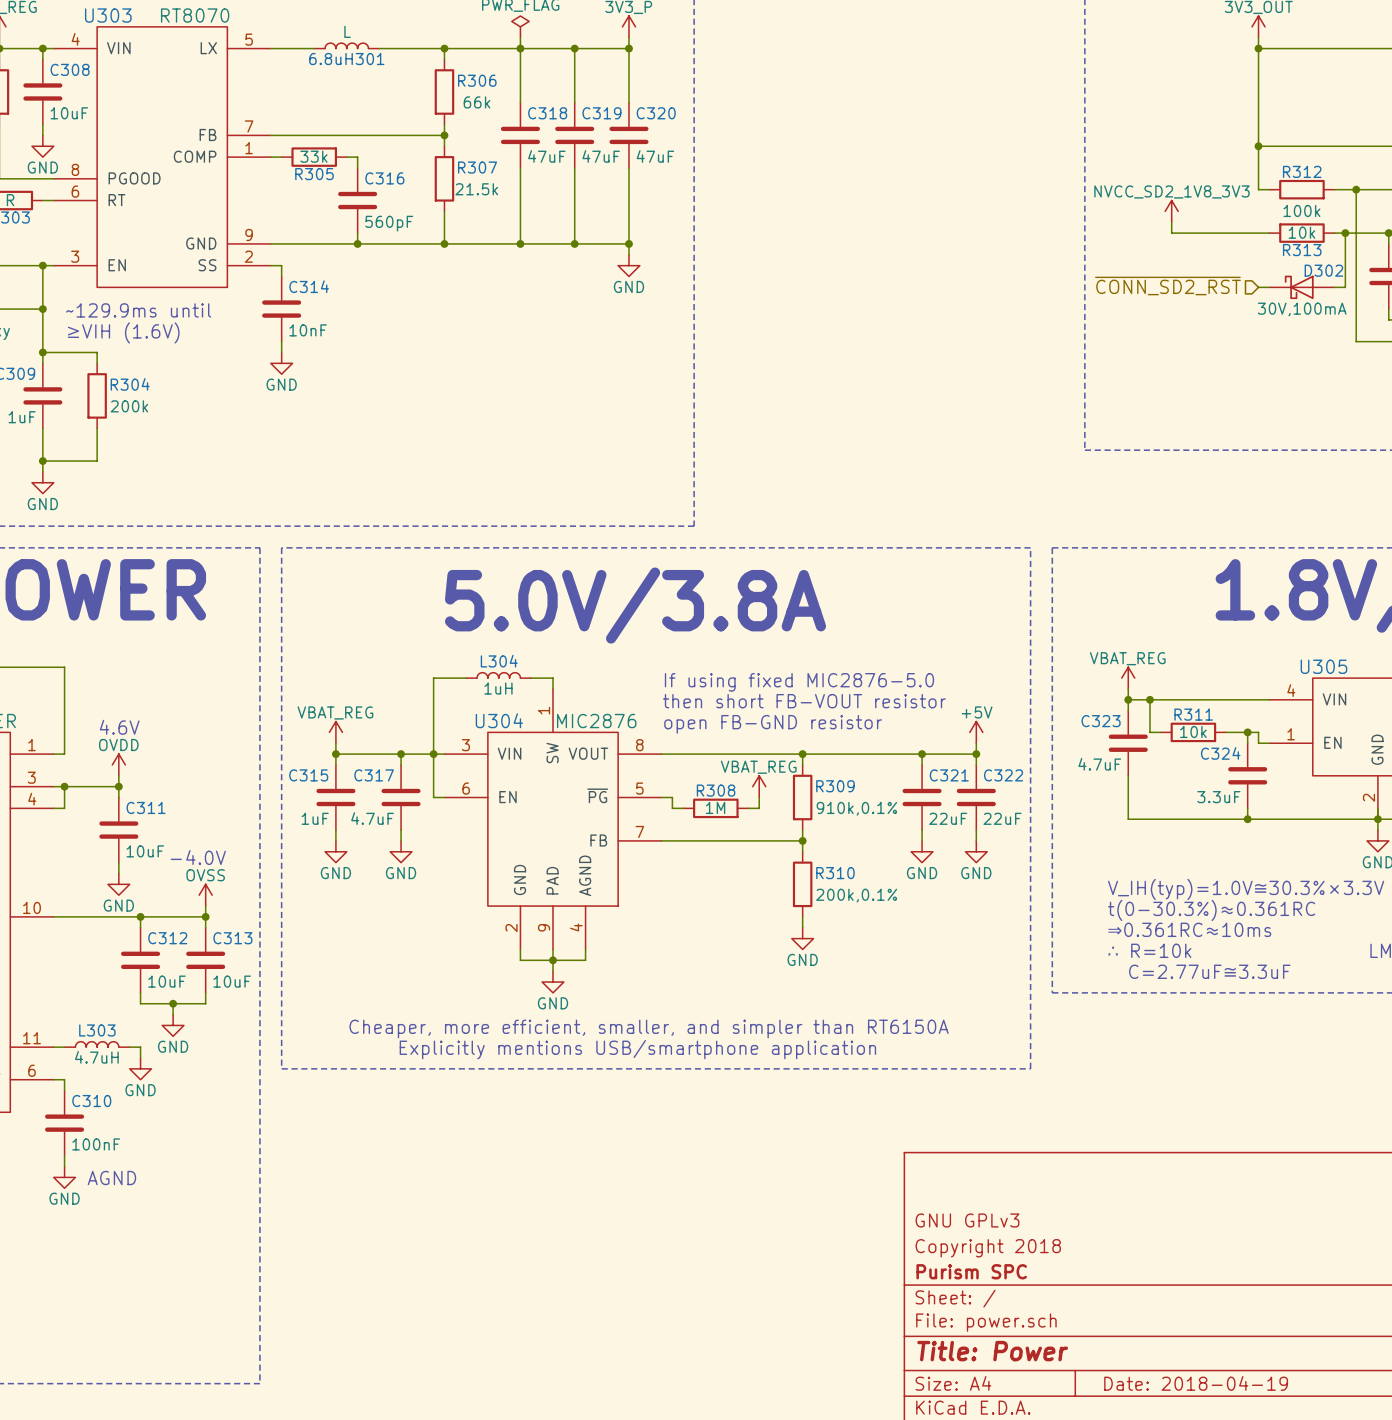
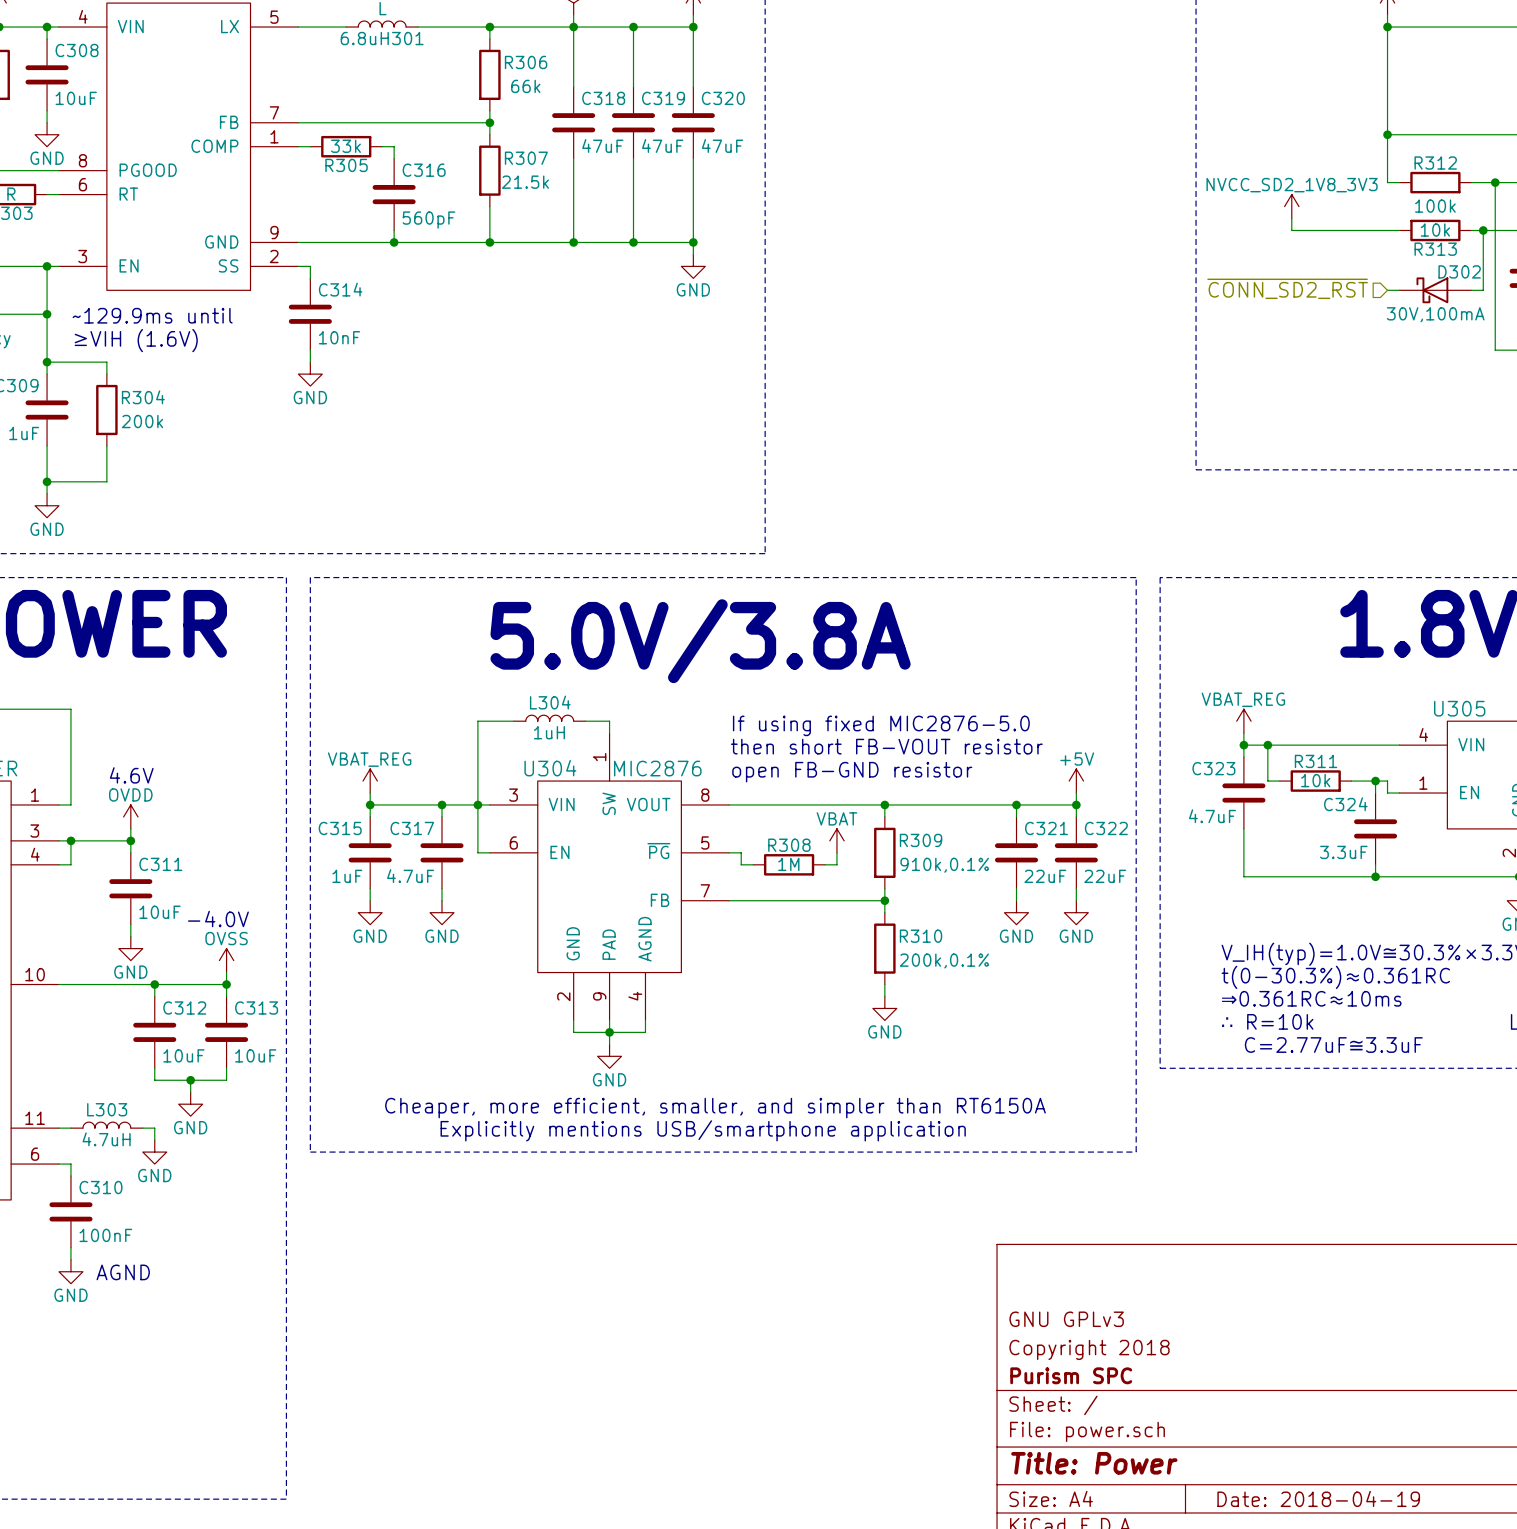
power symbol: VBAT_REG (759, 786) -> VBAT (836, 840)

